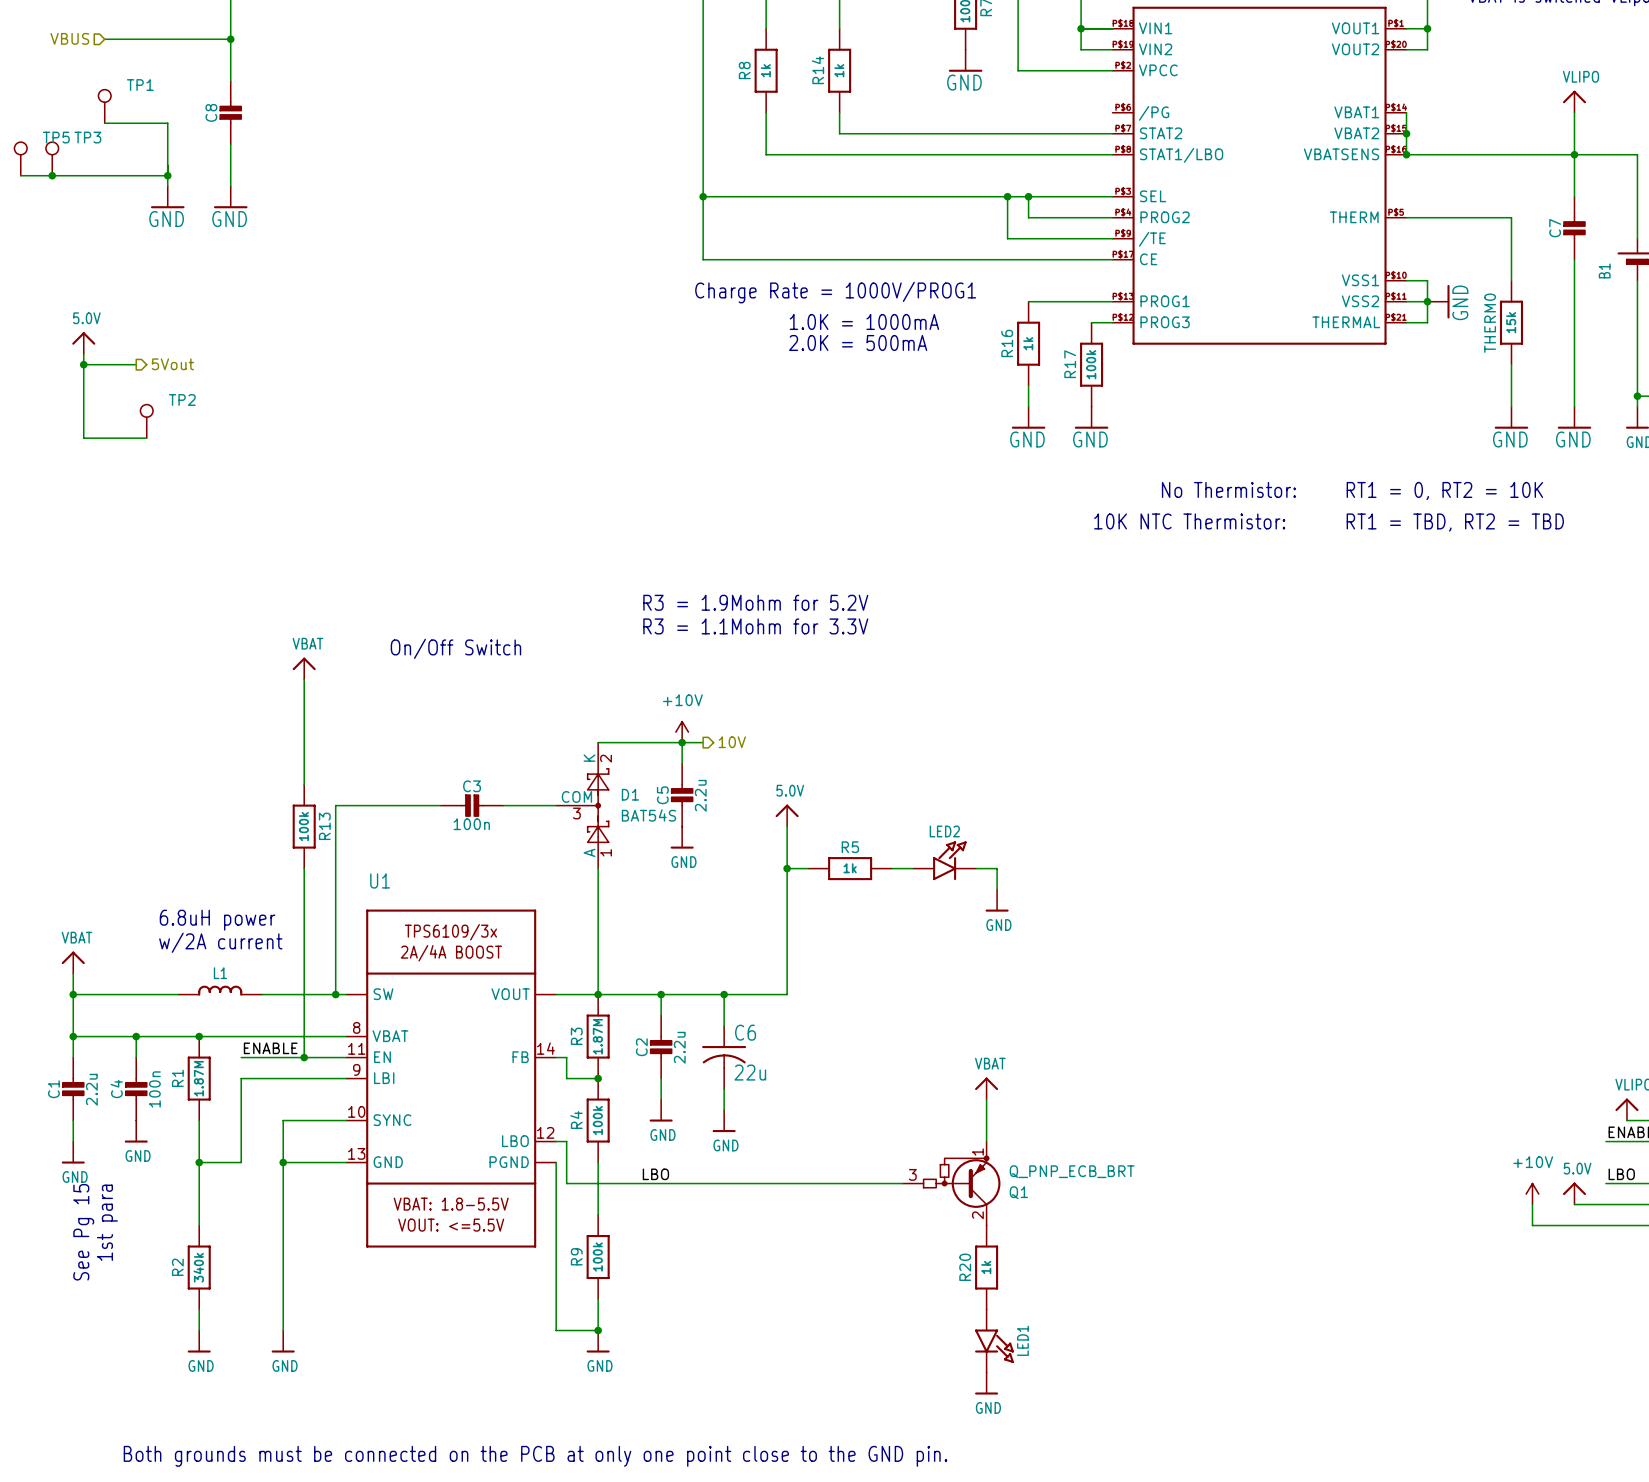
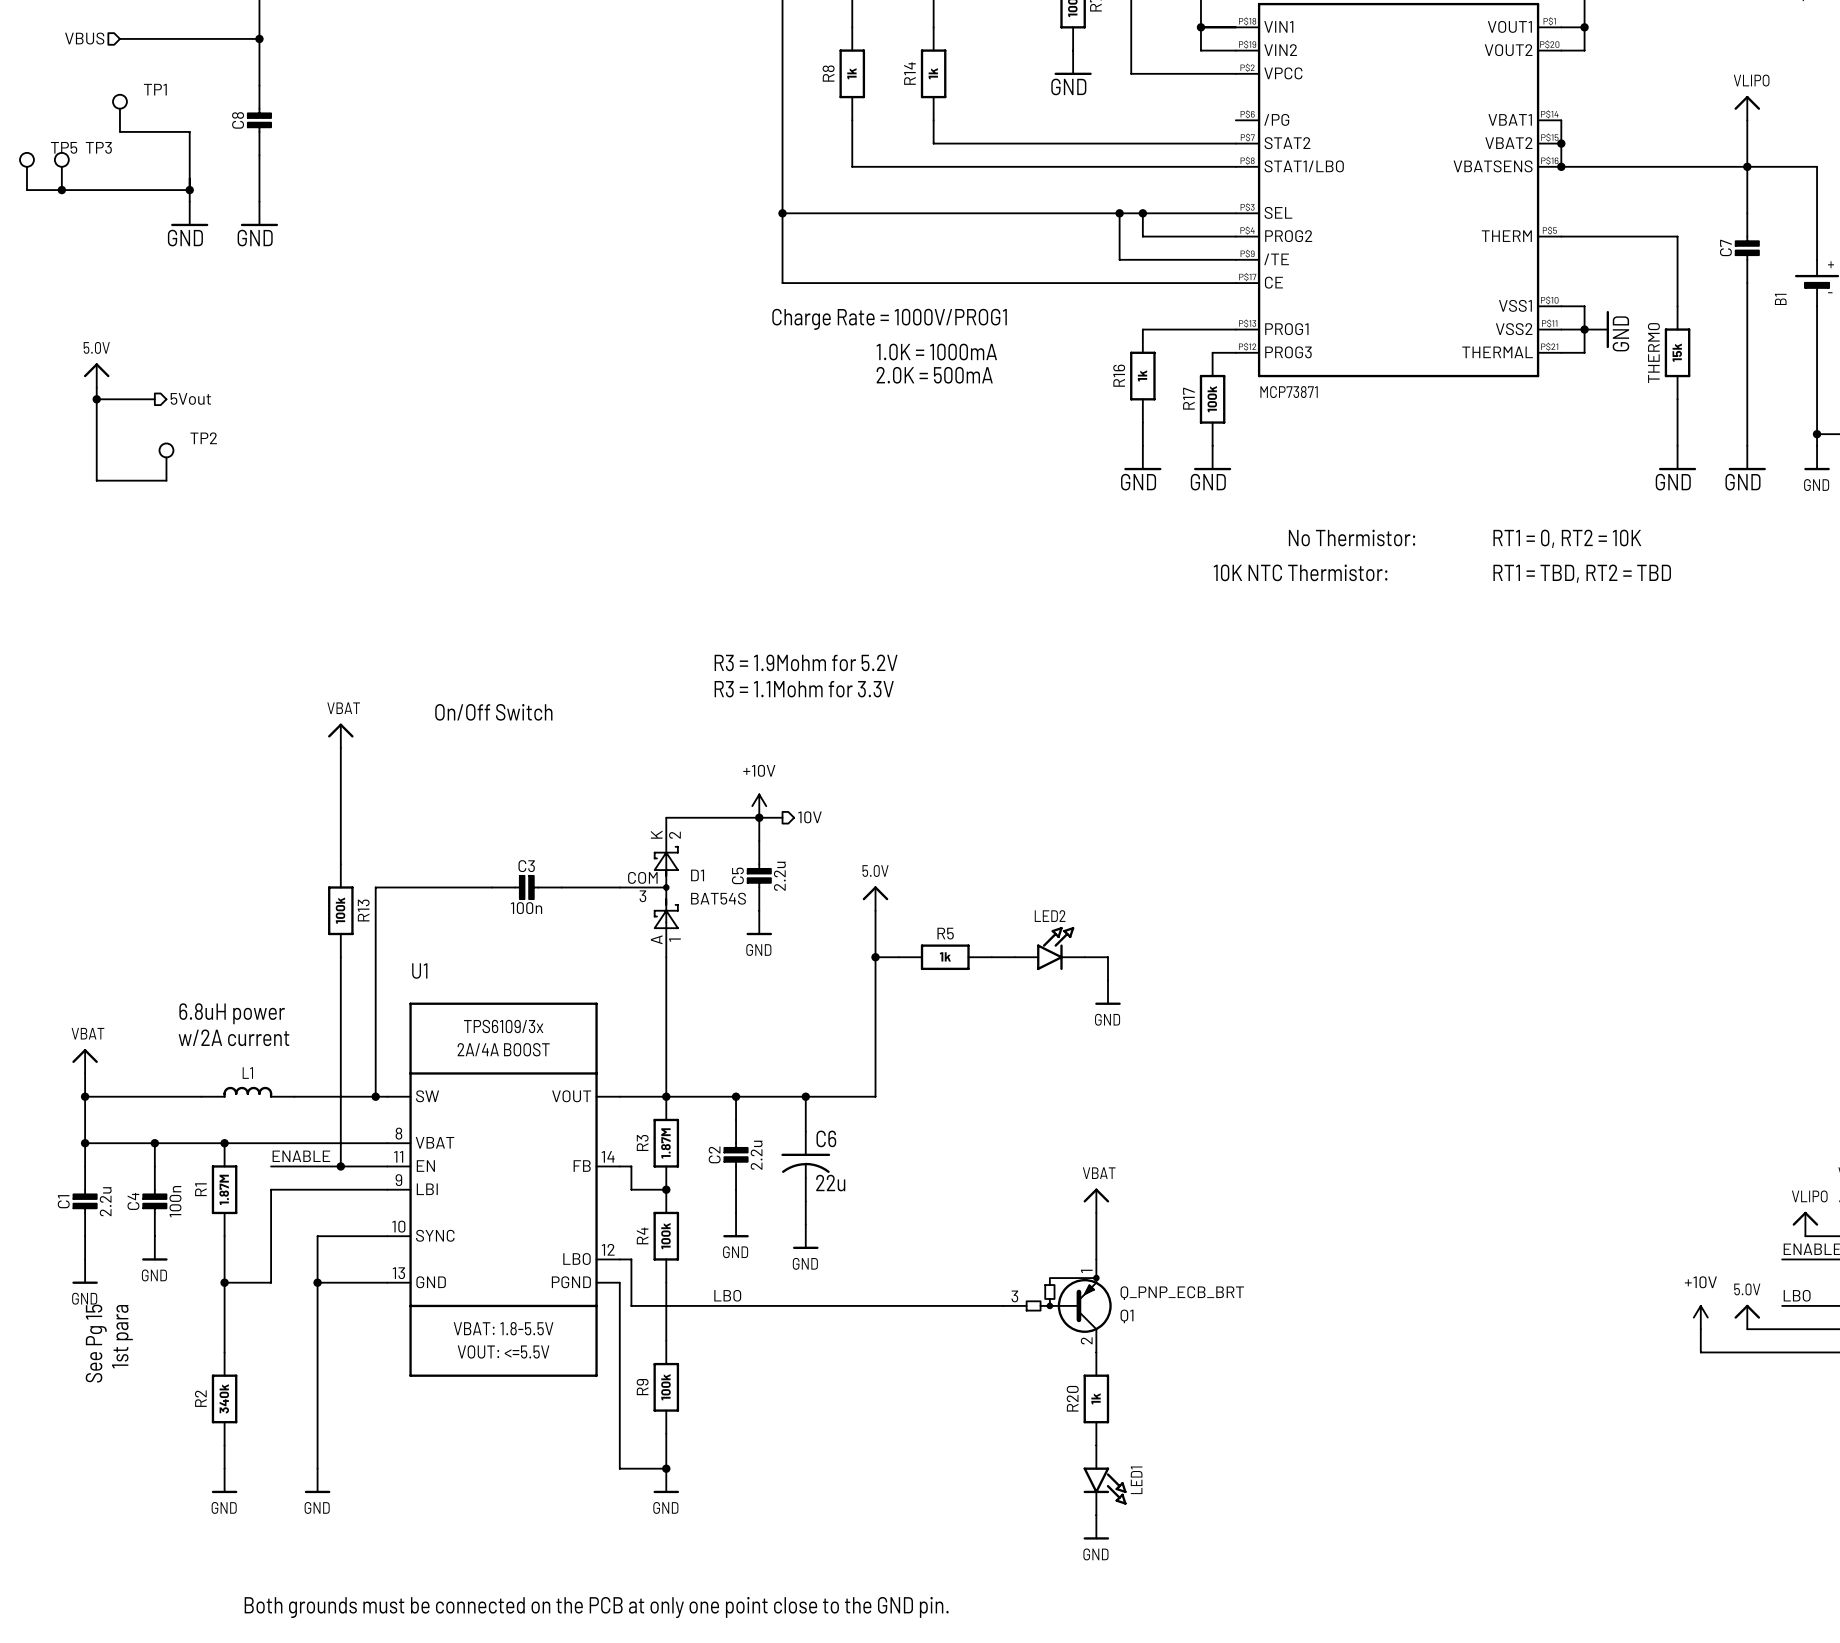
part value: none -> MCP73871 (1289, 392)

